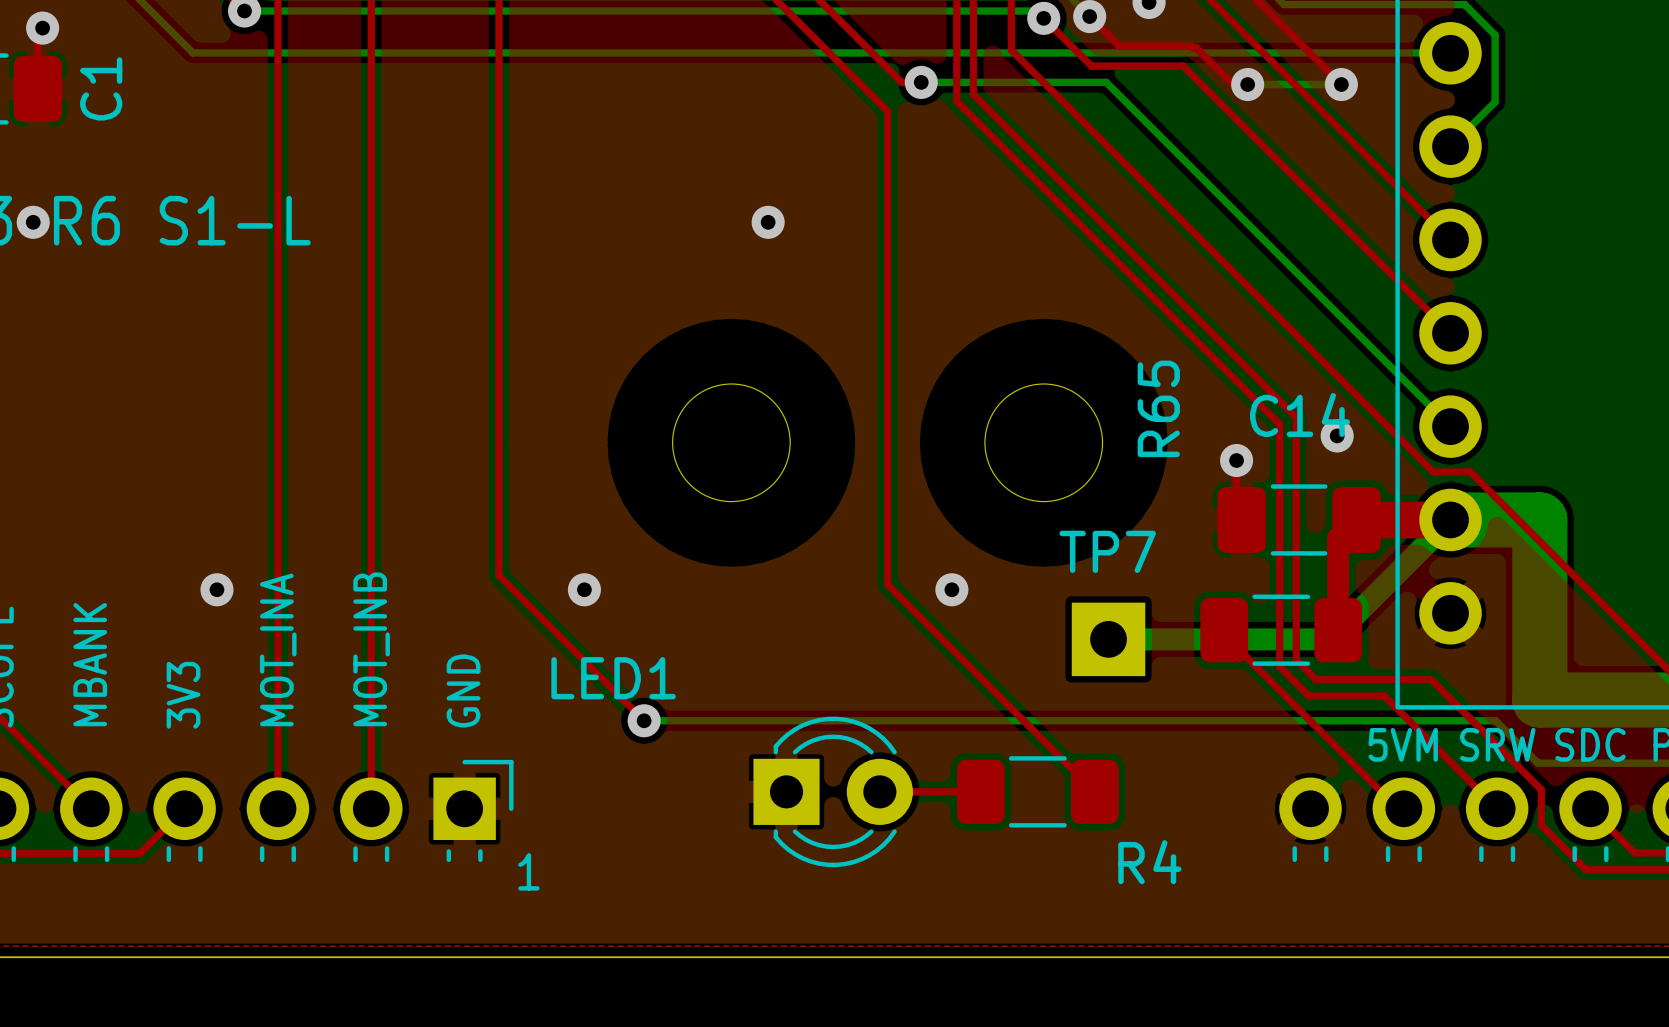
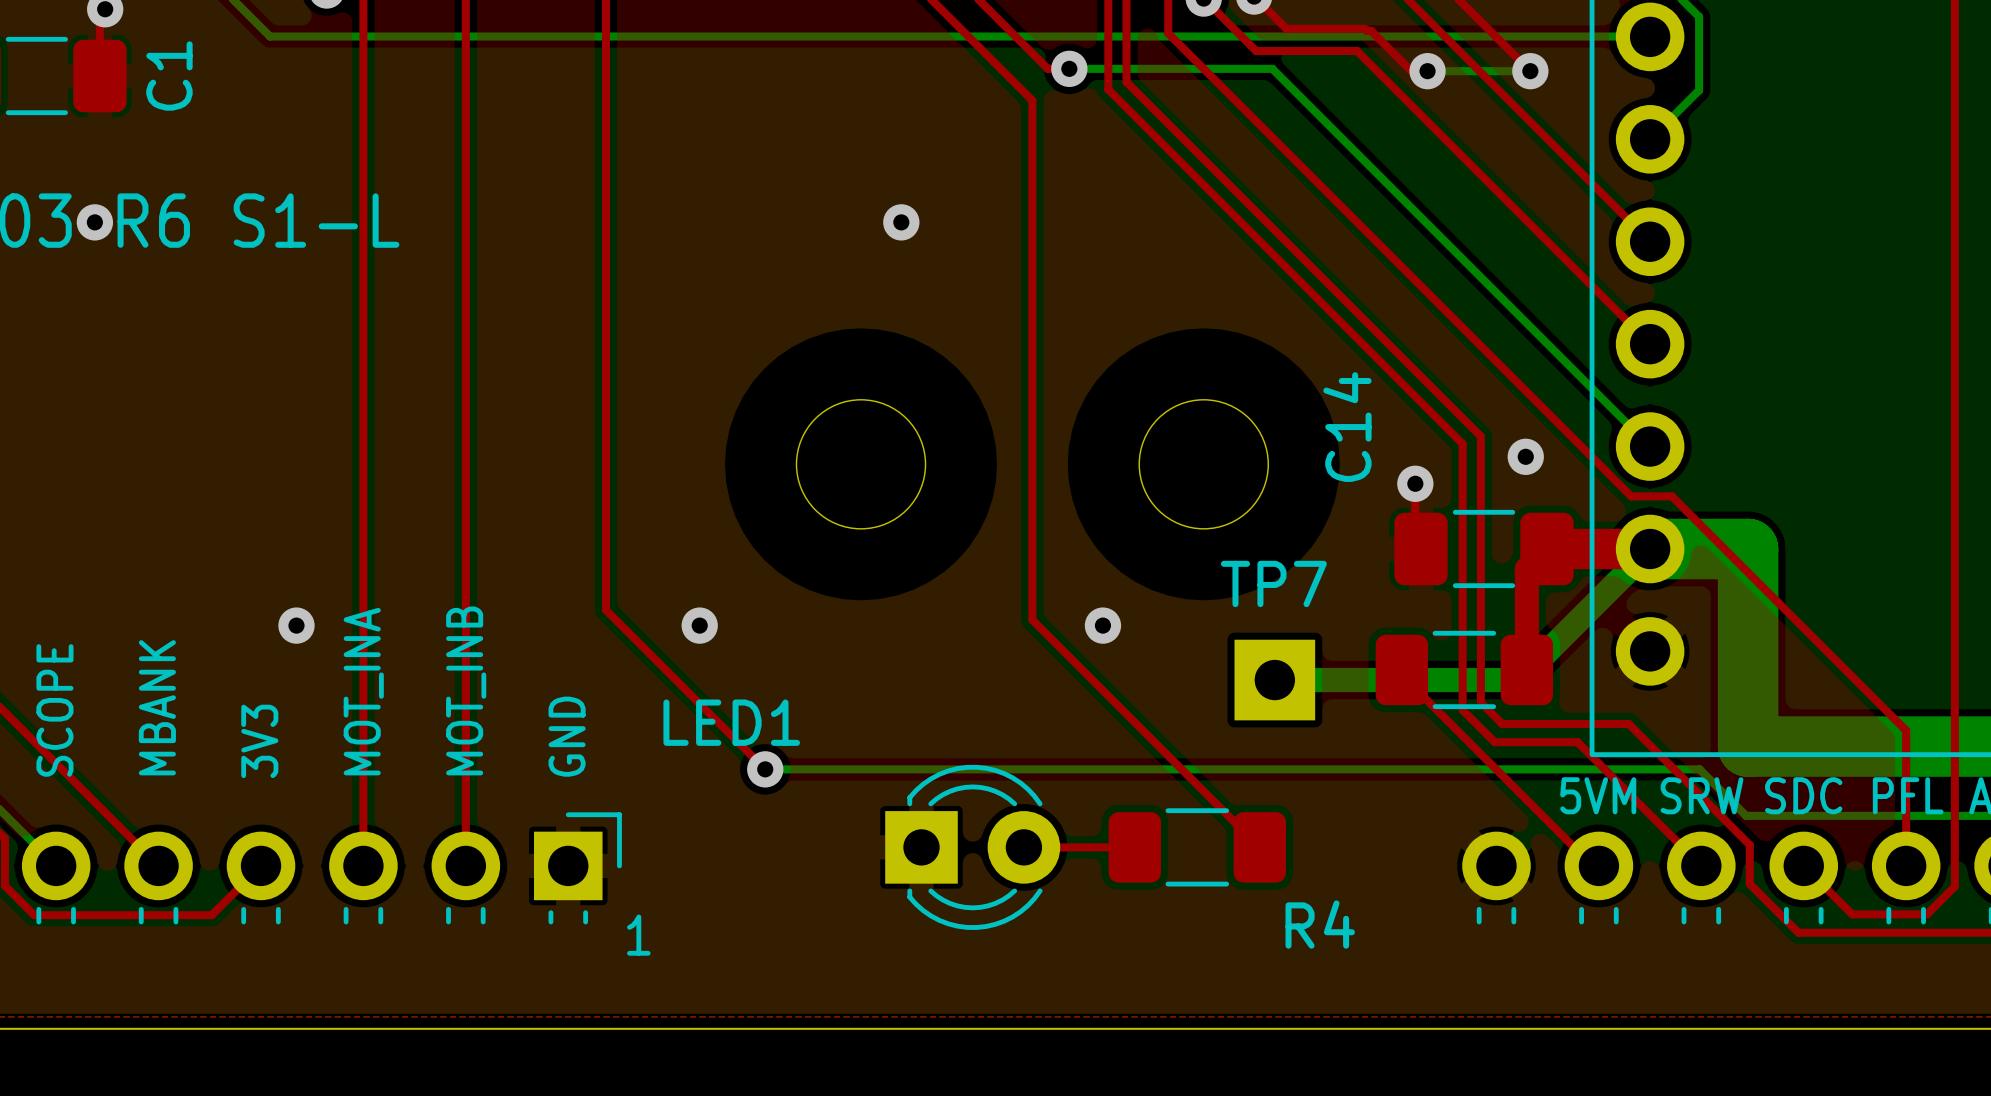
R65 name: R65 (1158, 408) -> none
C14 name rotation: 0° (1300, 415) -> 90° counterclockwise (1347, 427)

